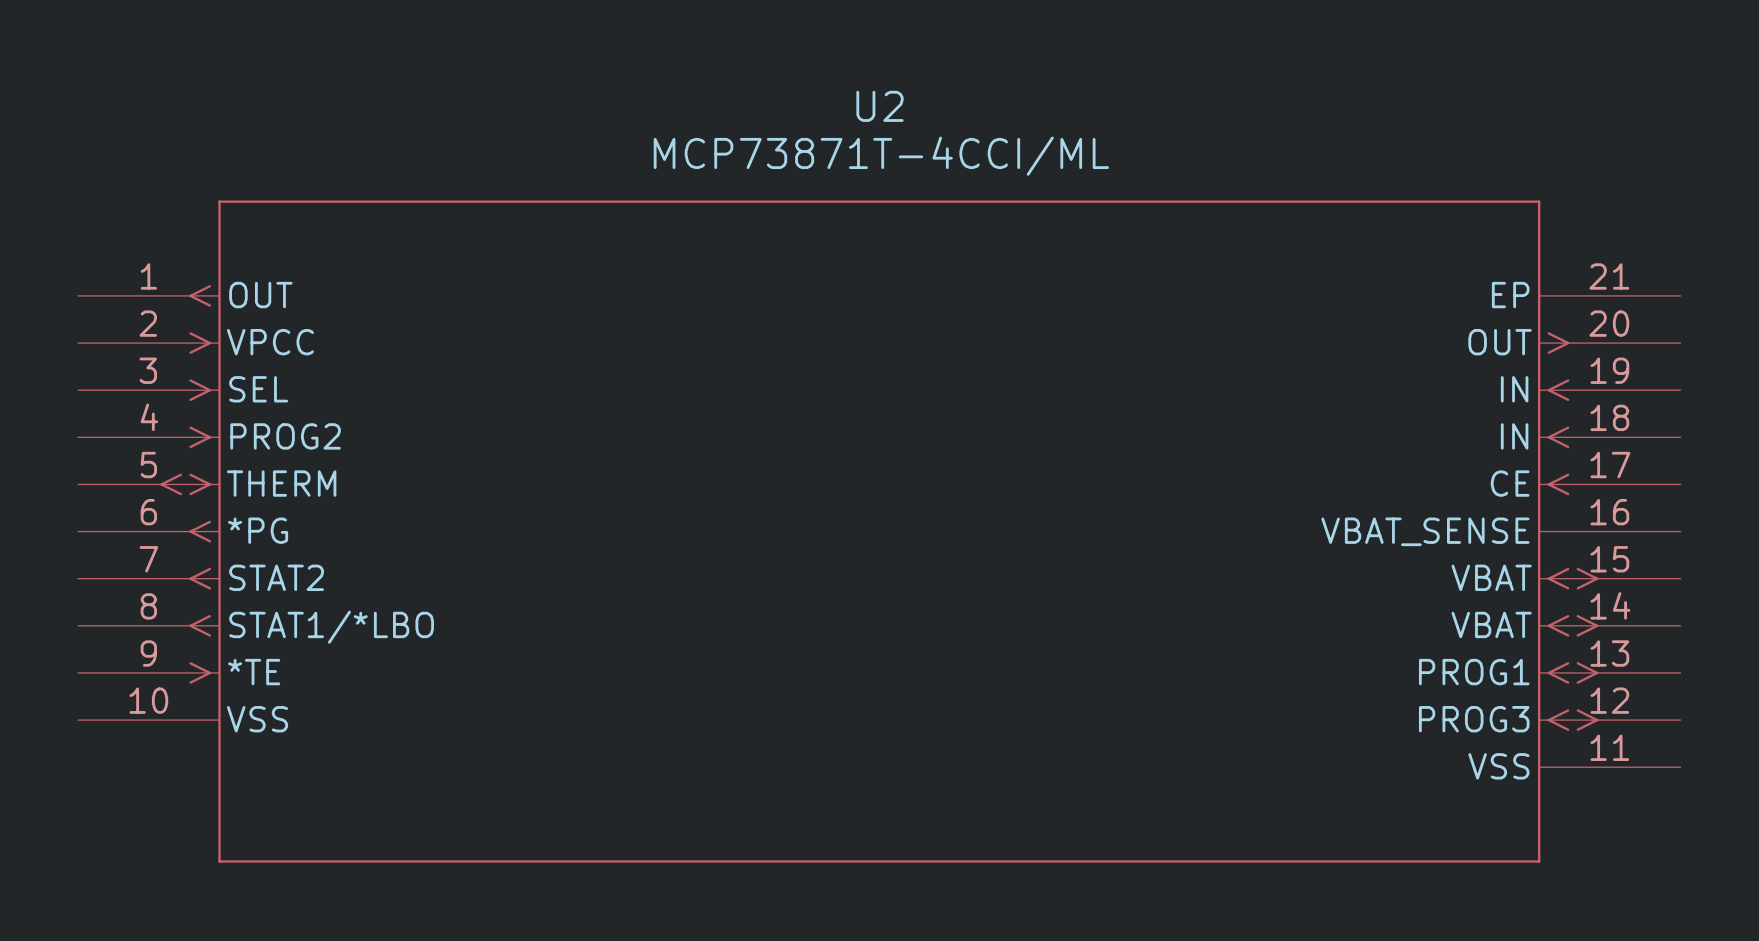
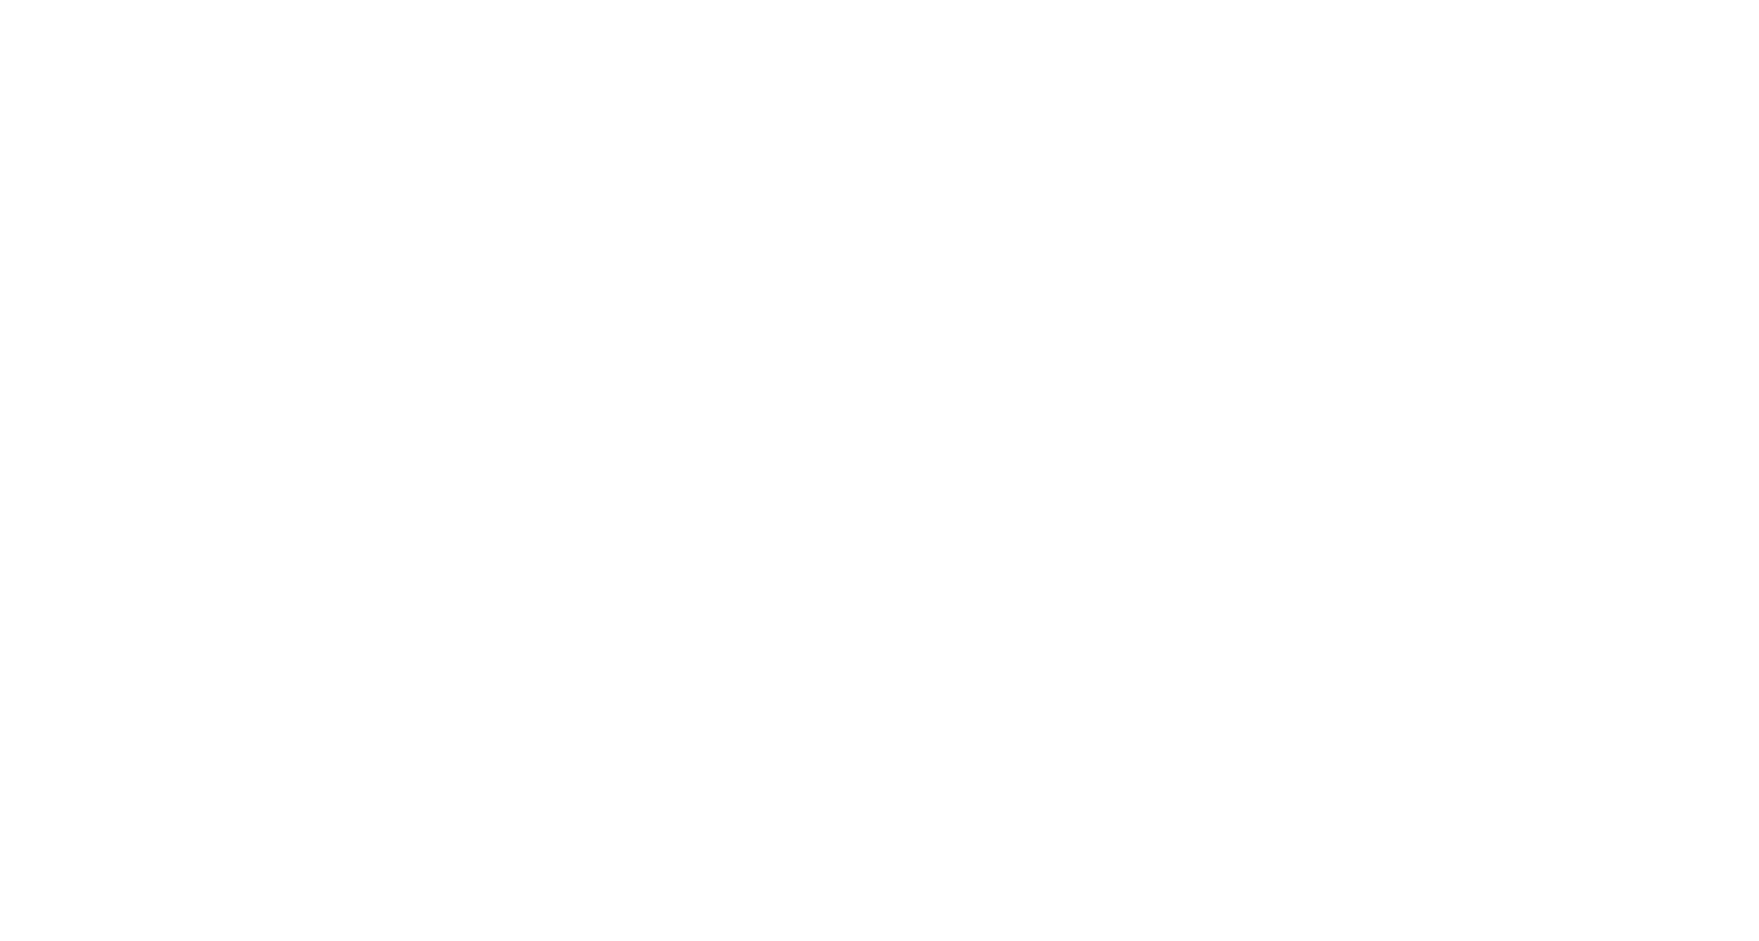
U2: MCP73871T-4CCI/ML (879, 531) -> none

